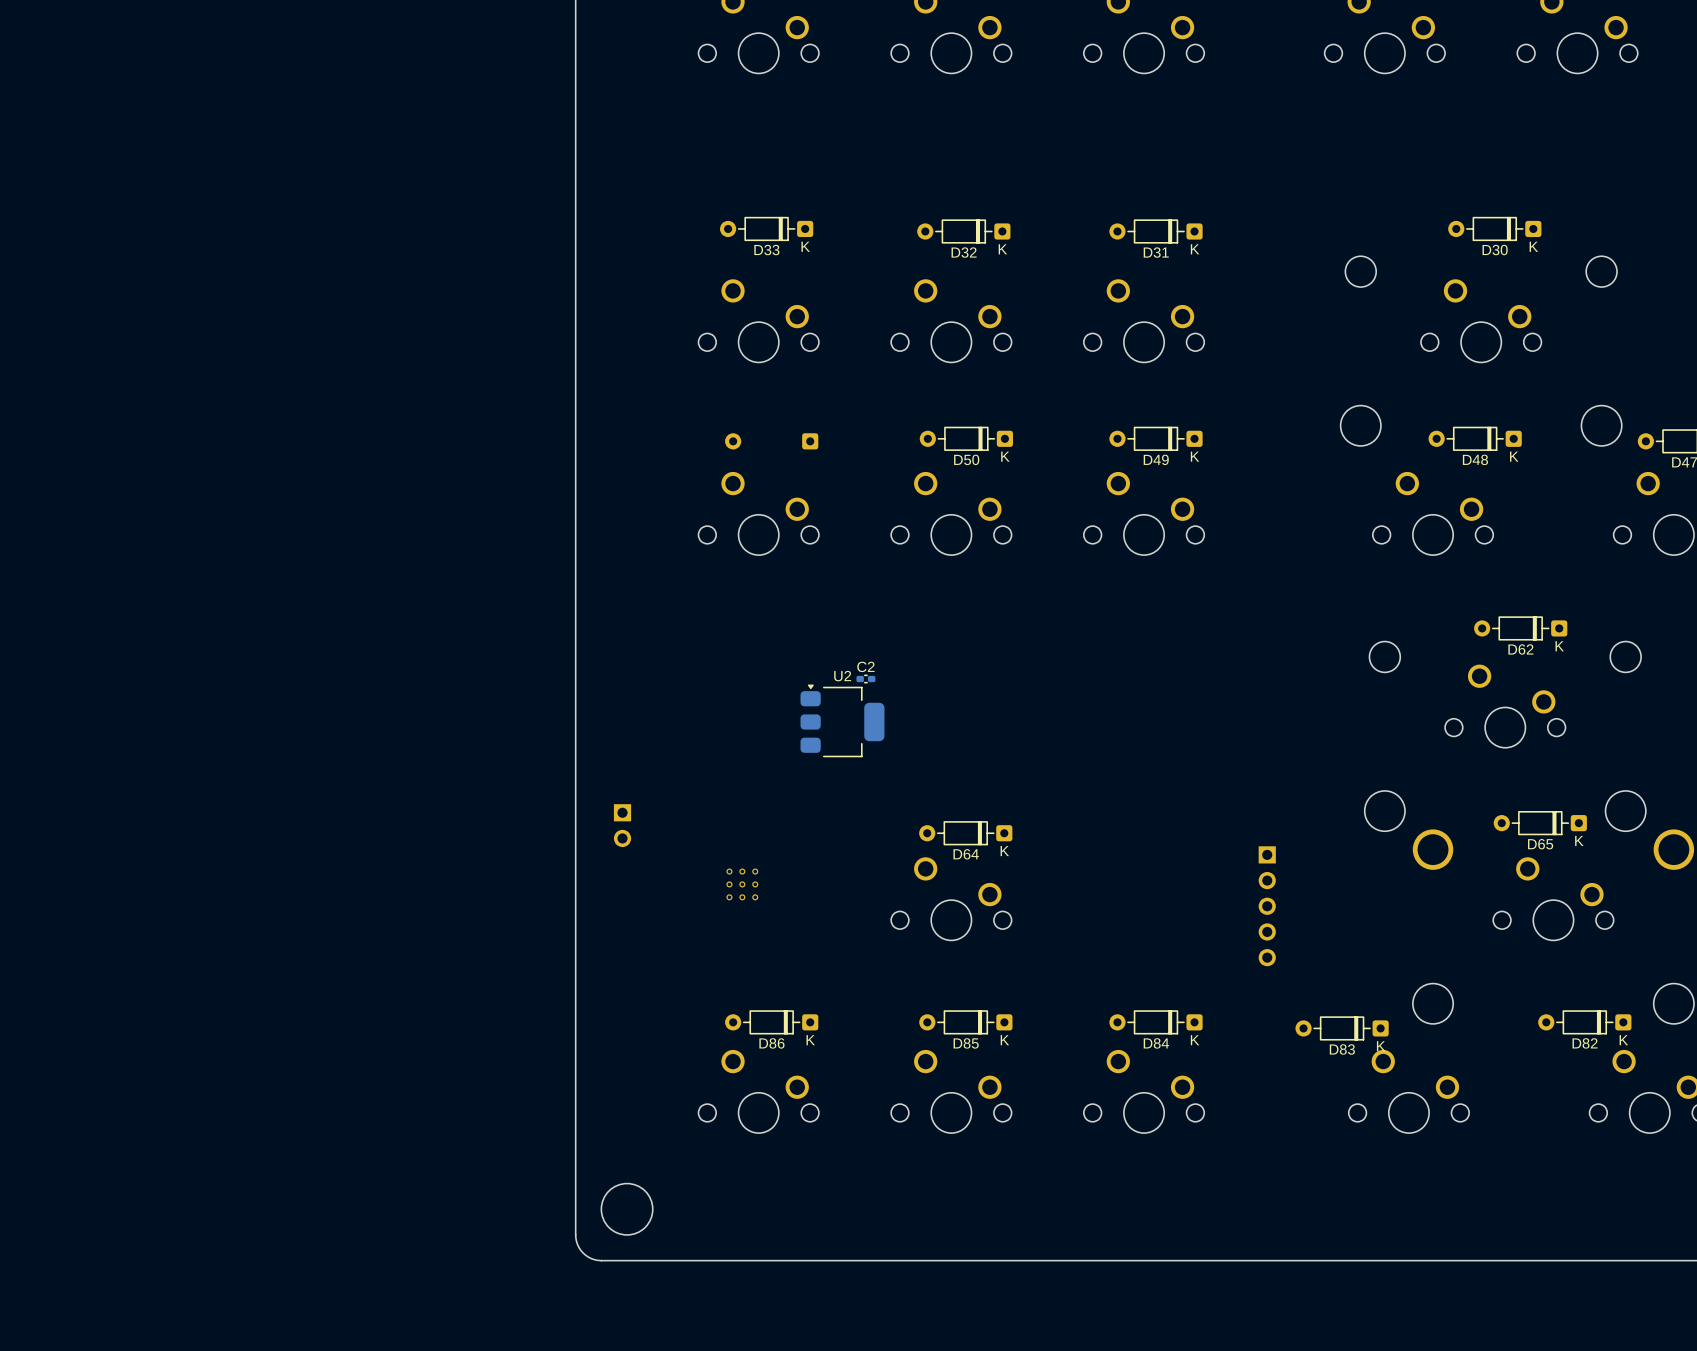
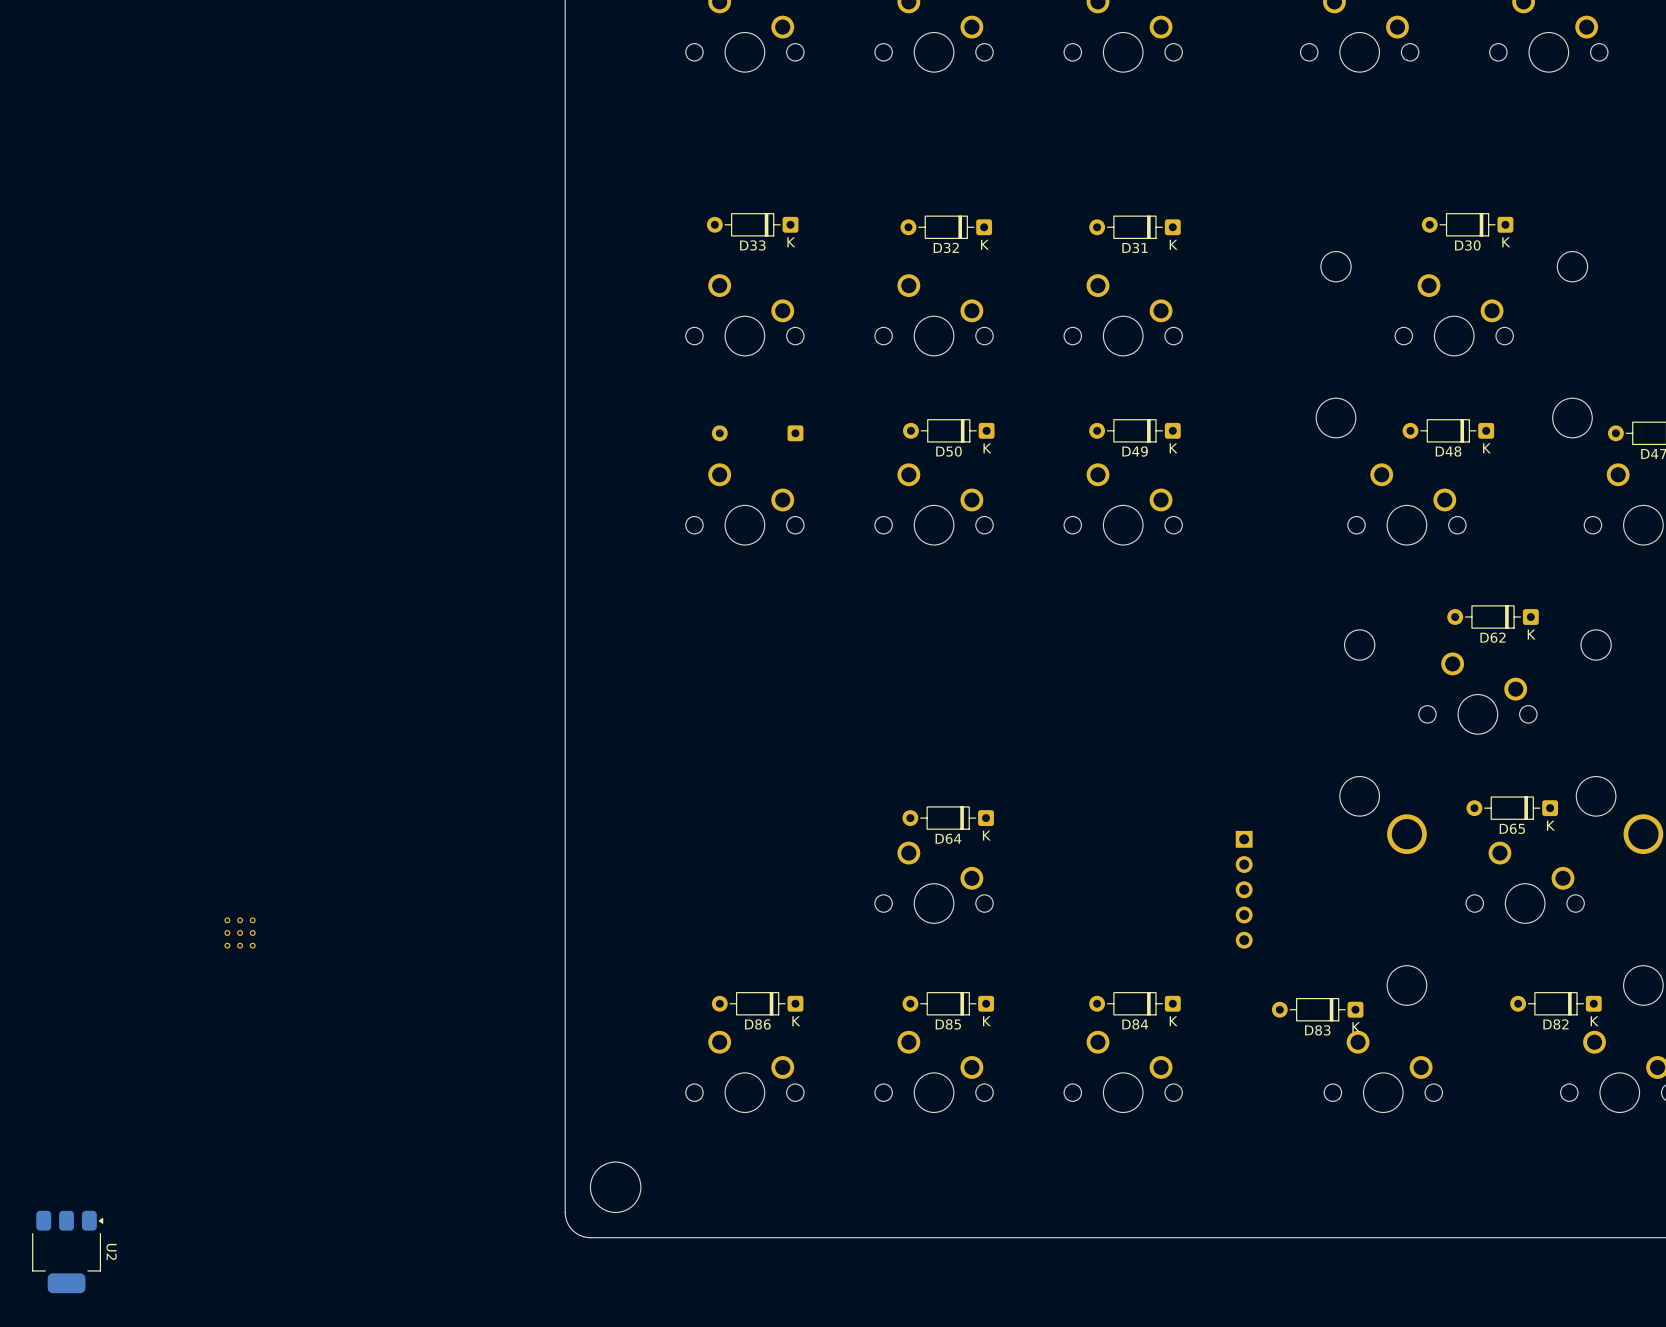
C2: (865, 679) -> none
U2 rotation: 0° (842, 720) -> 90° clockwise (67, 1251)
U2 position: (842, 720) -> (67, 1251)
part: (622, 825) -> none
part: (742, 884) -> none
part: none -> (240, 933)

